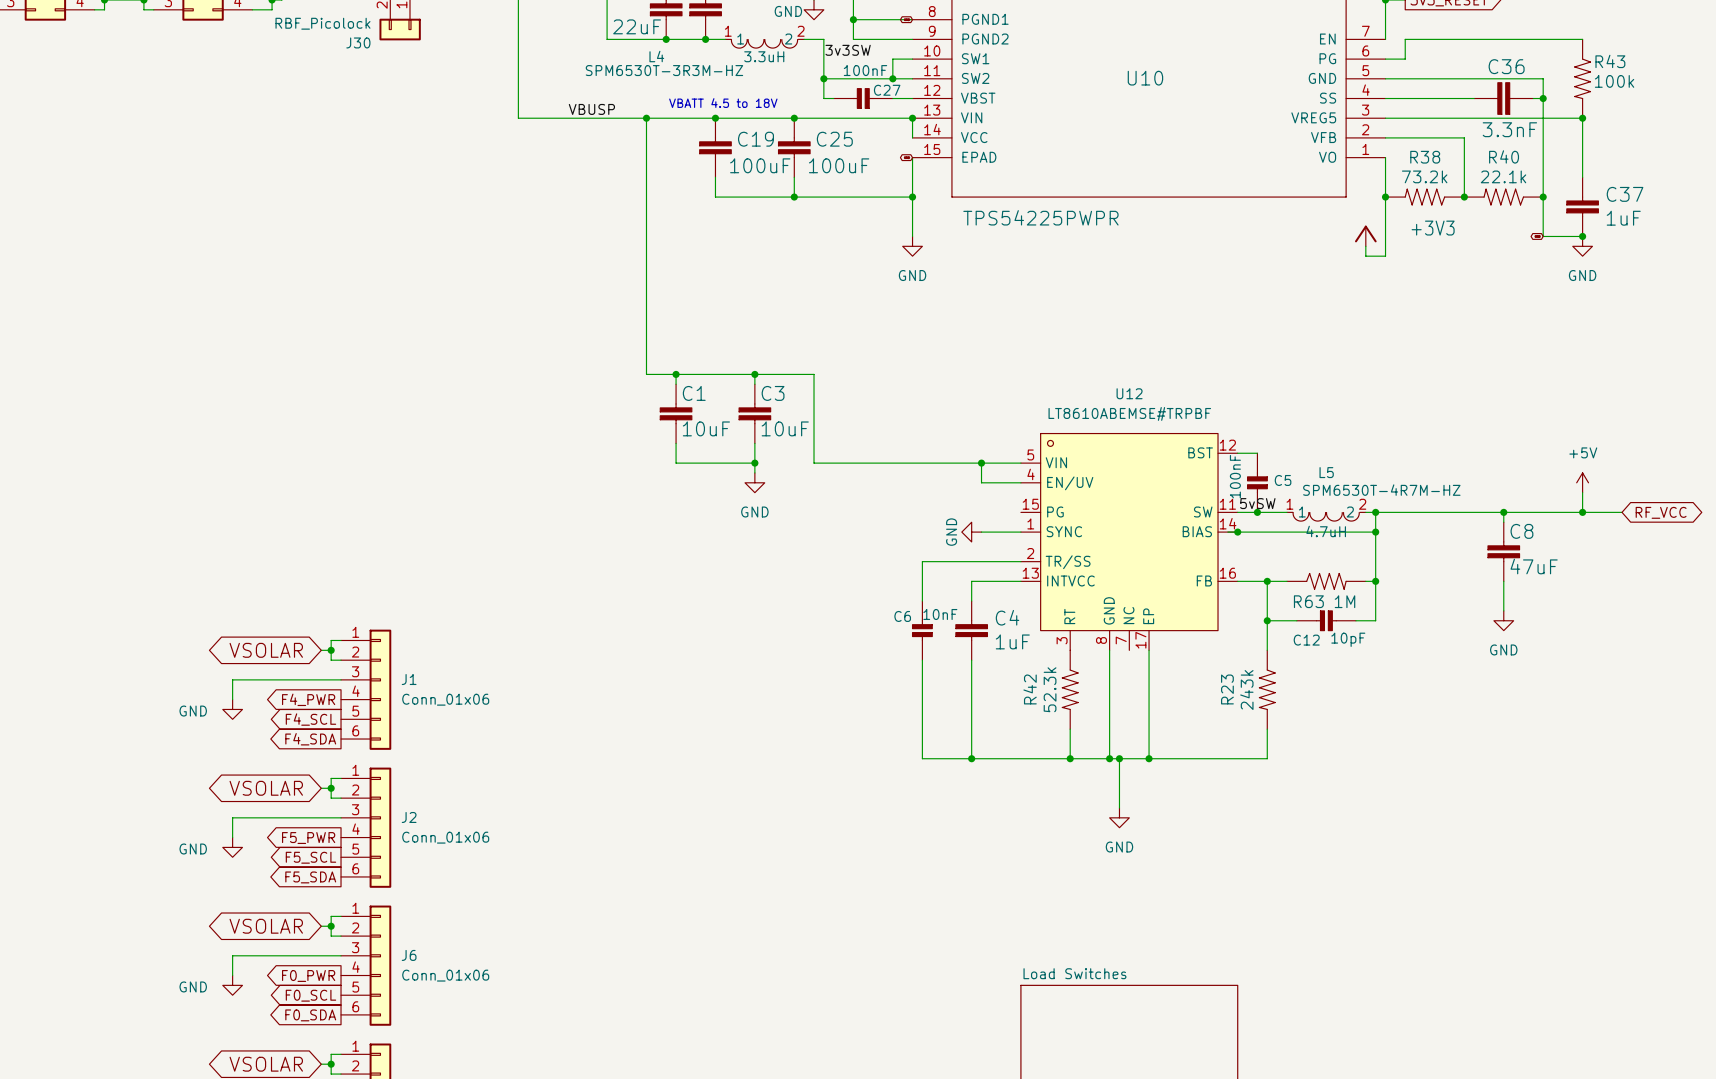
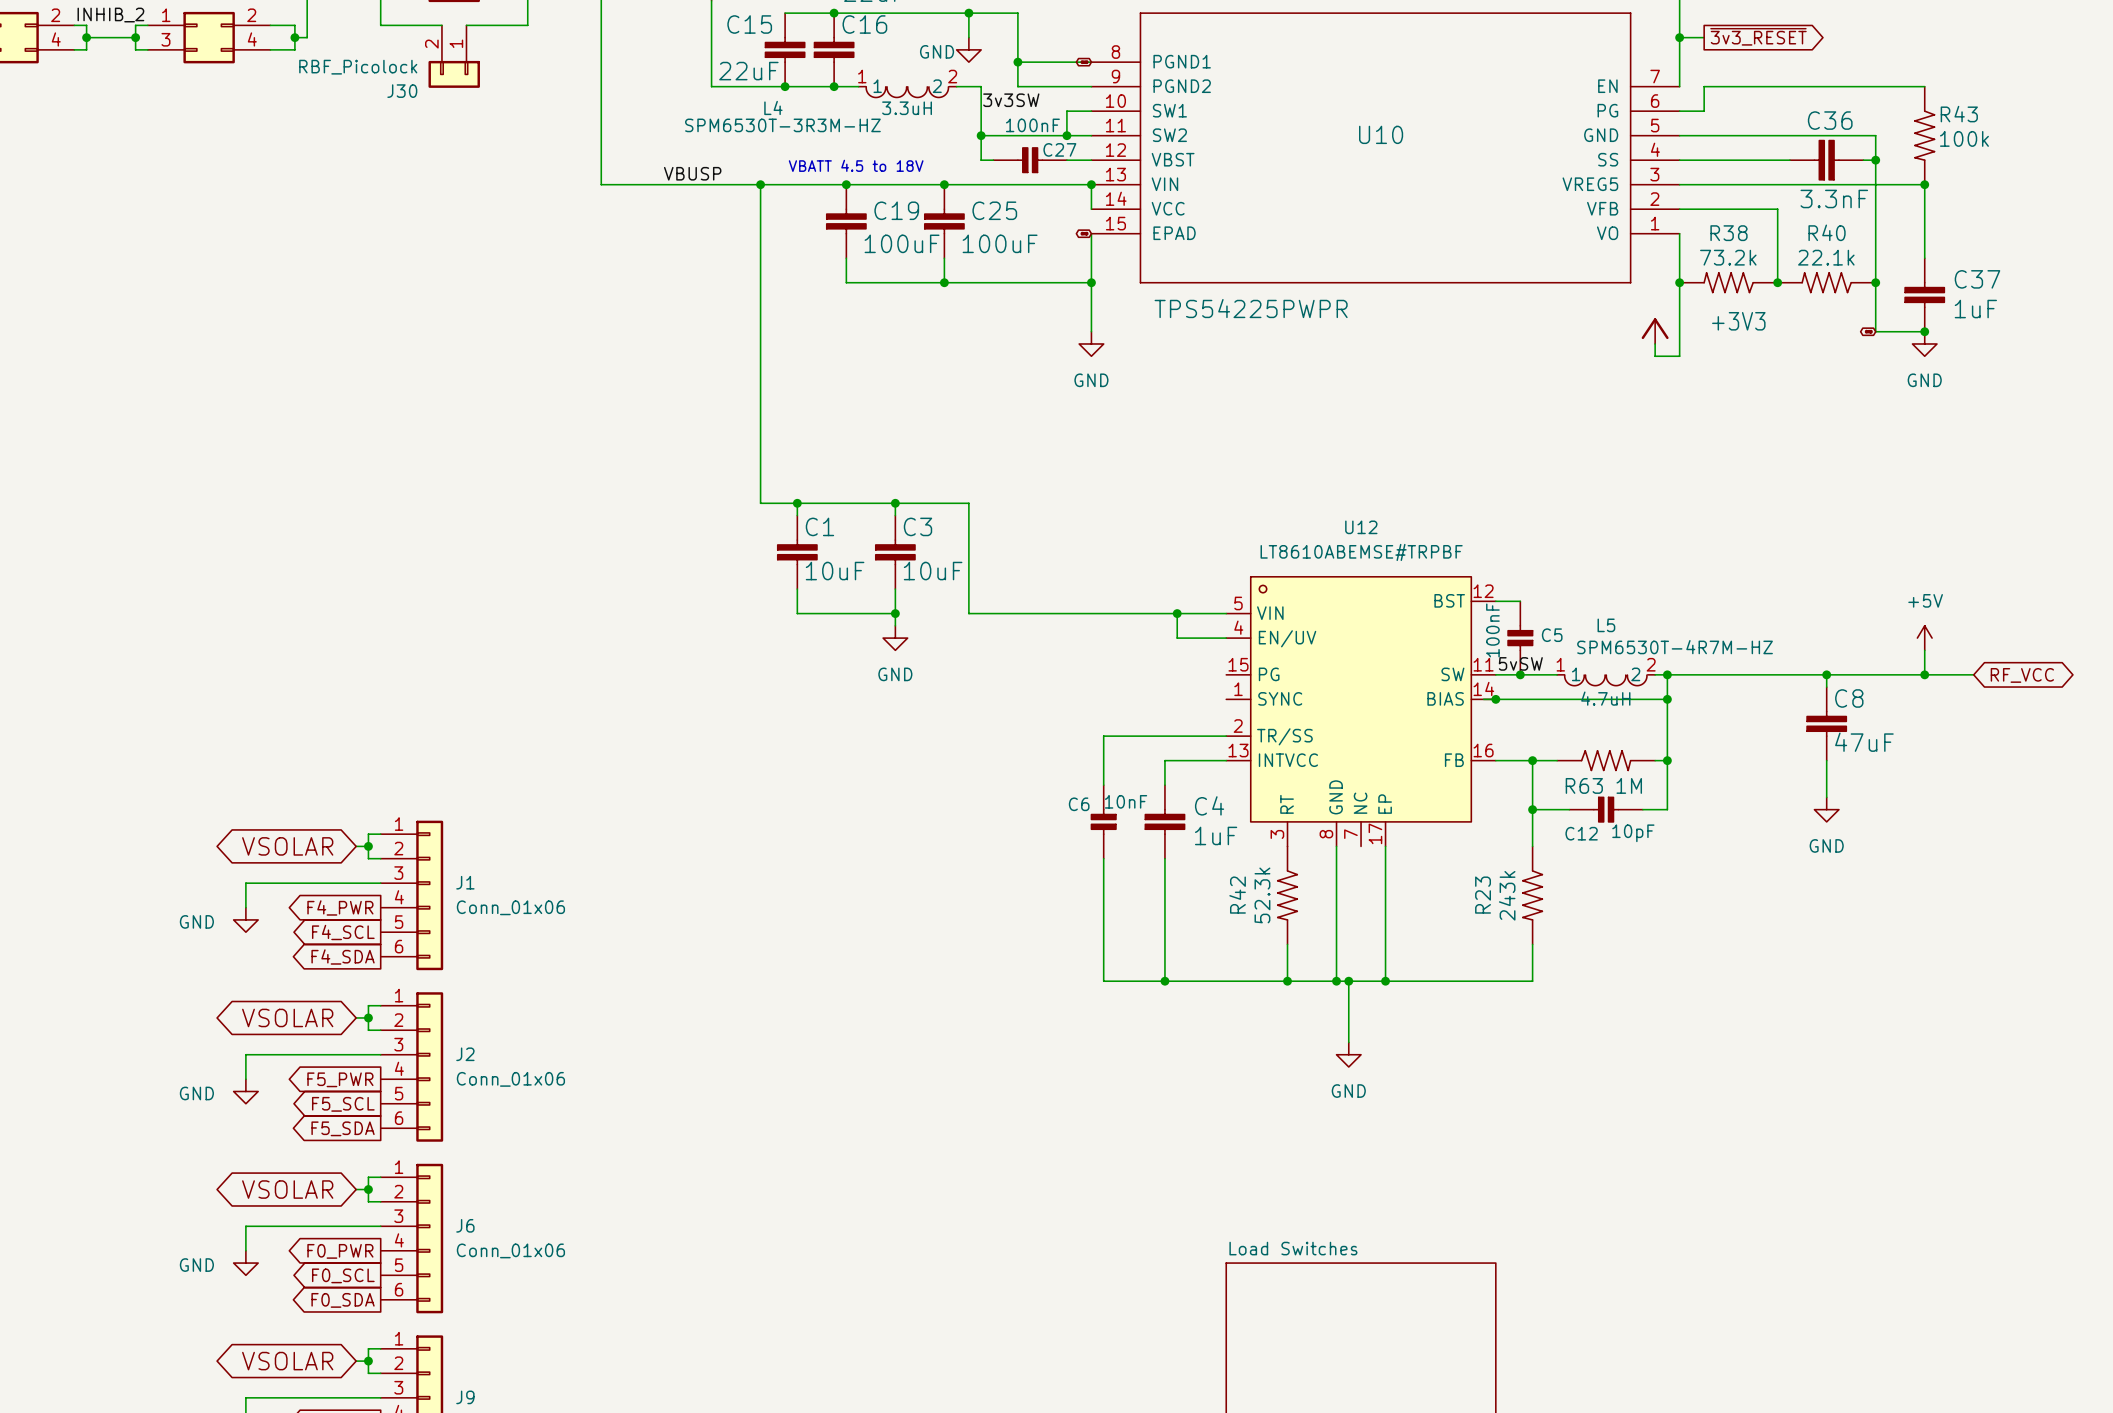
power symbol: GND (971, 532) -> none
wire: (981, 532) (1020, 532) -> none

